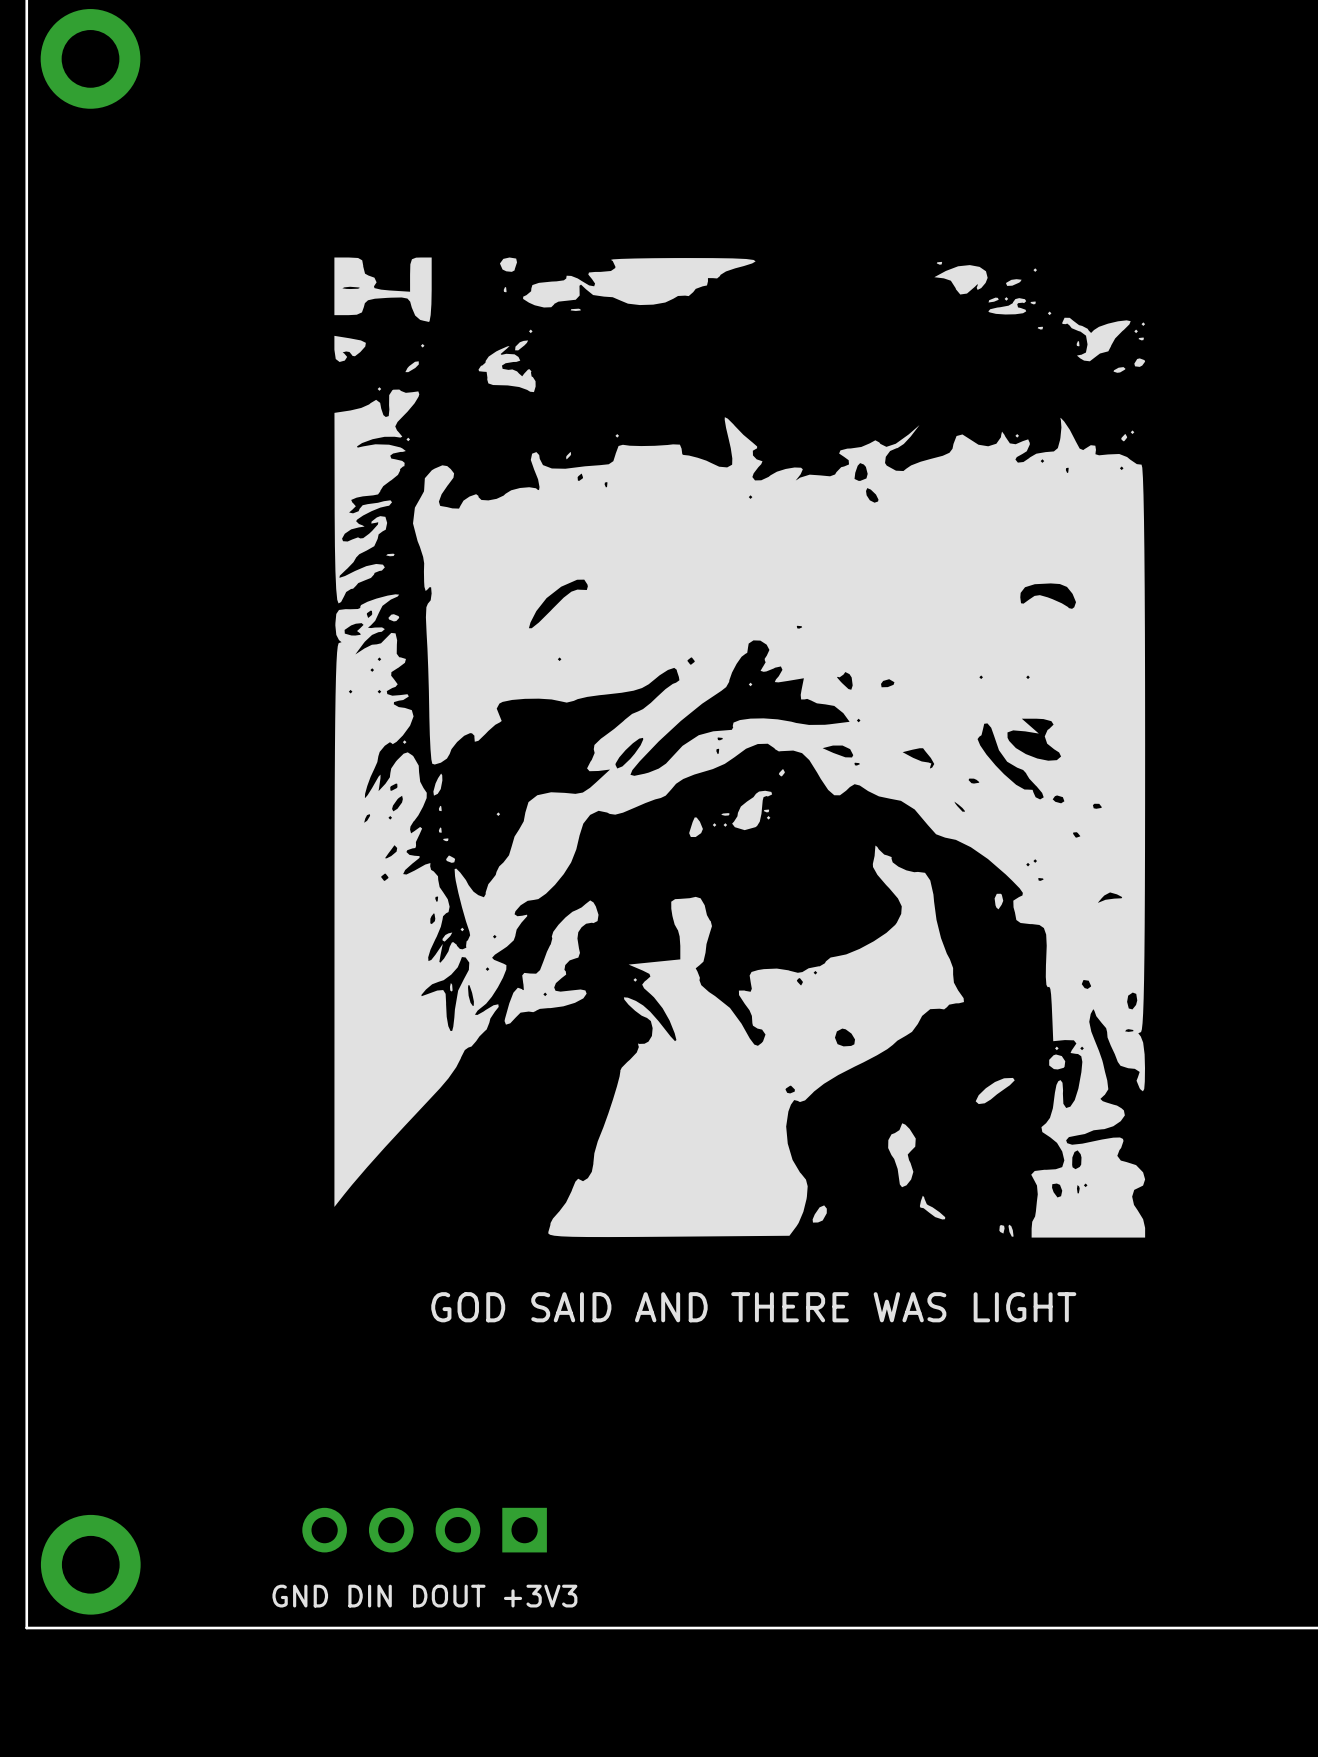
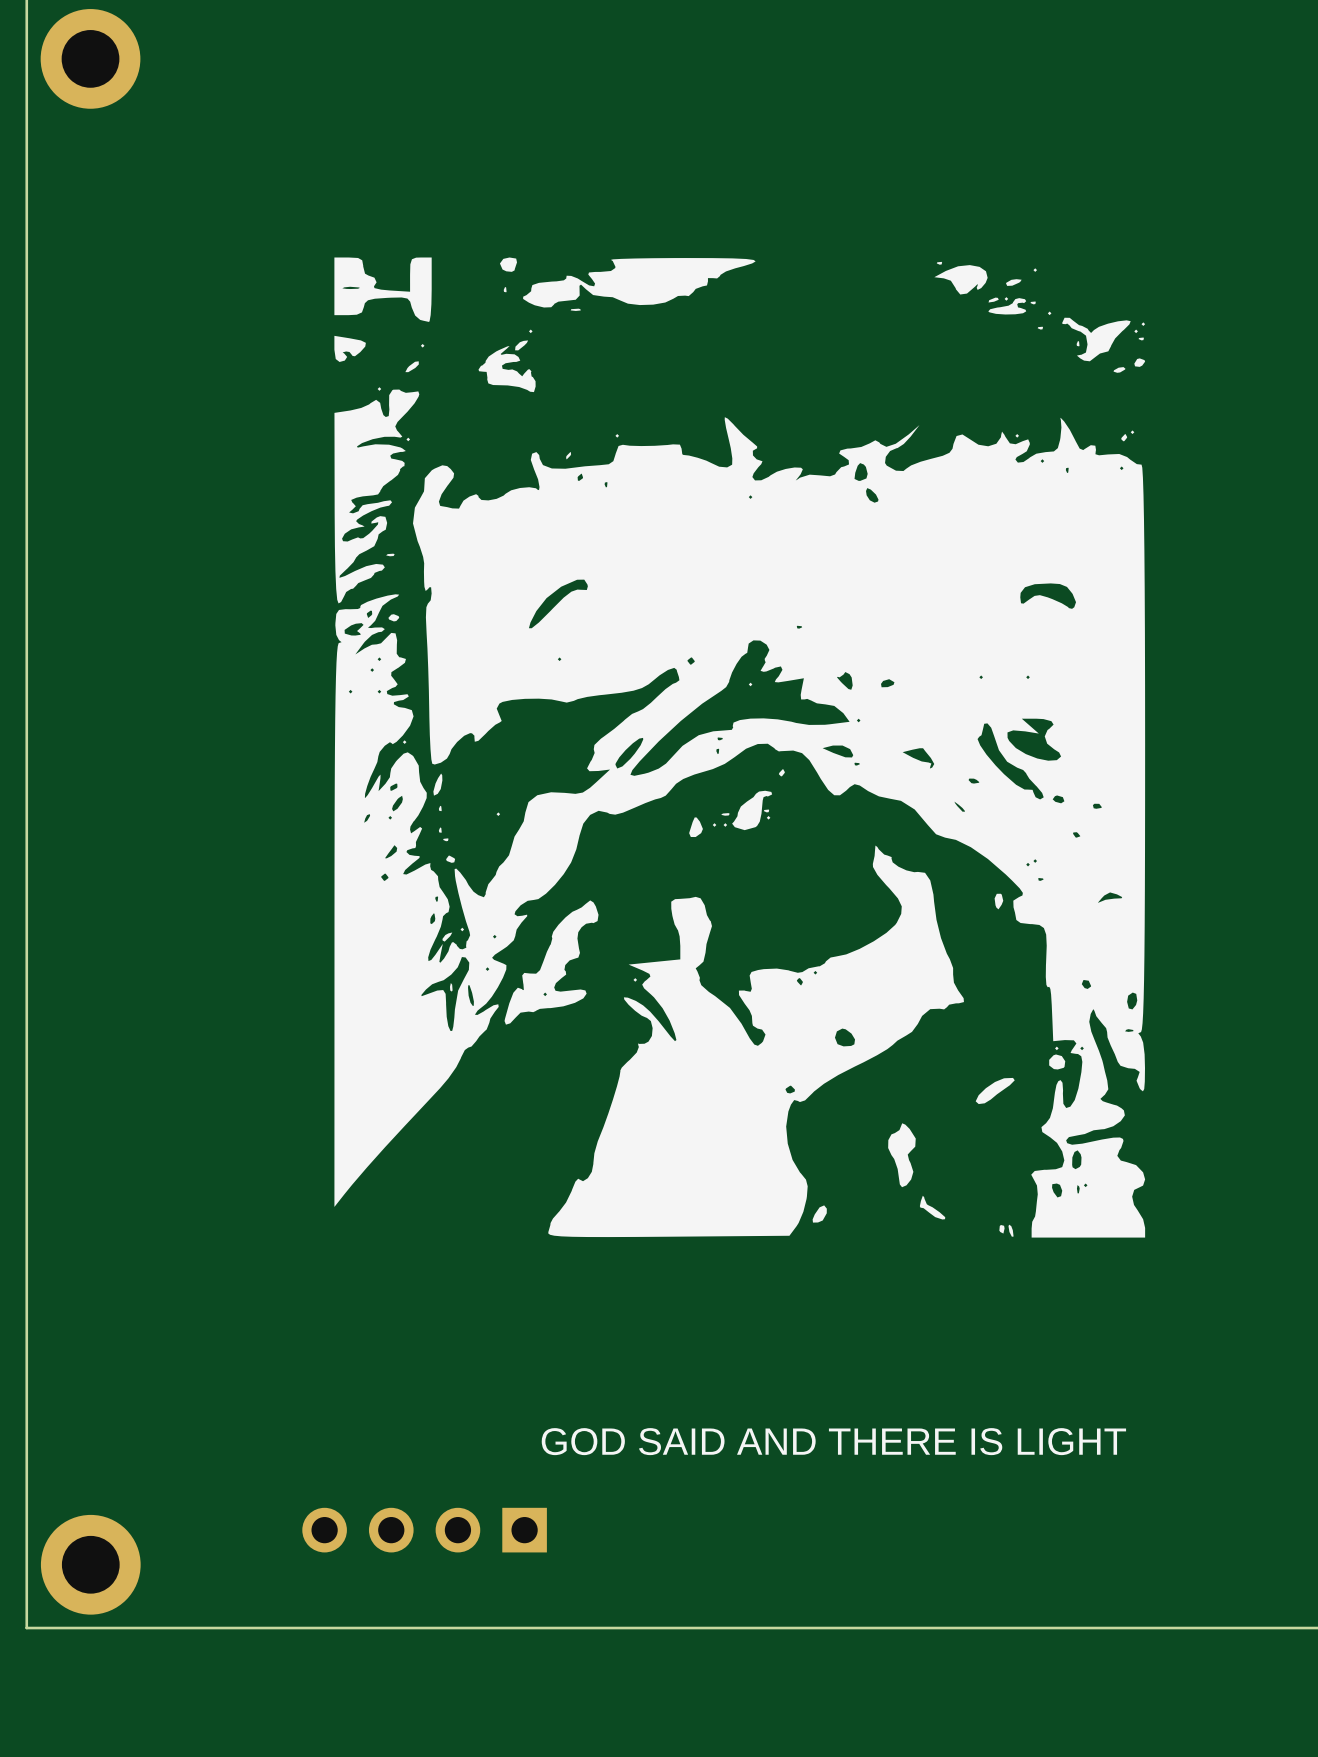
text: GOD SAID AND THERE WAS LIGHT (753, 1307) -> none
text: none -> GOD SAID AND THERE IS LIGHT (833, 1441)
text: GND DIN DOUT +3V3 (424, 1596) -> none

